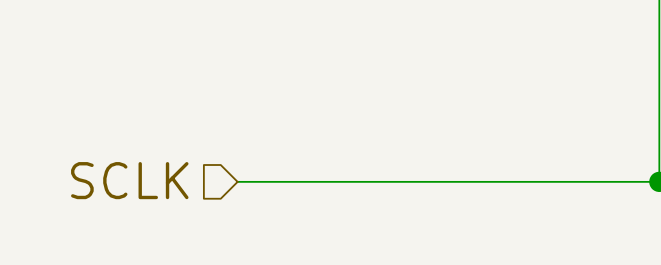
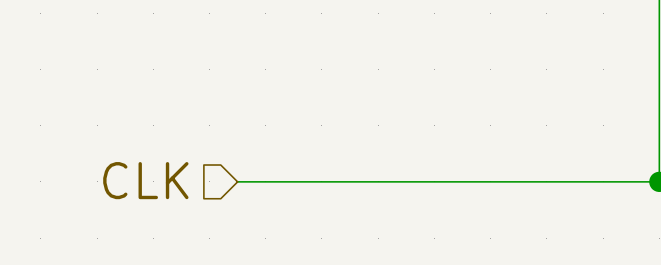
hierarchical label: SCLK (129, 180) -> CLK (145, 180)

